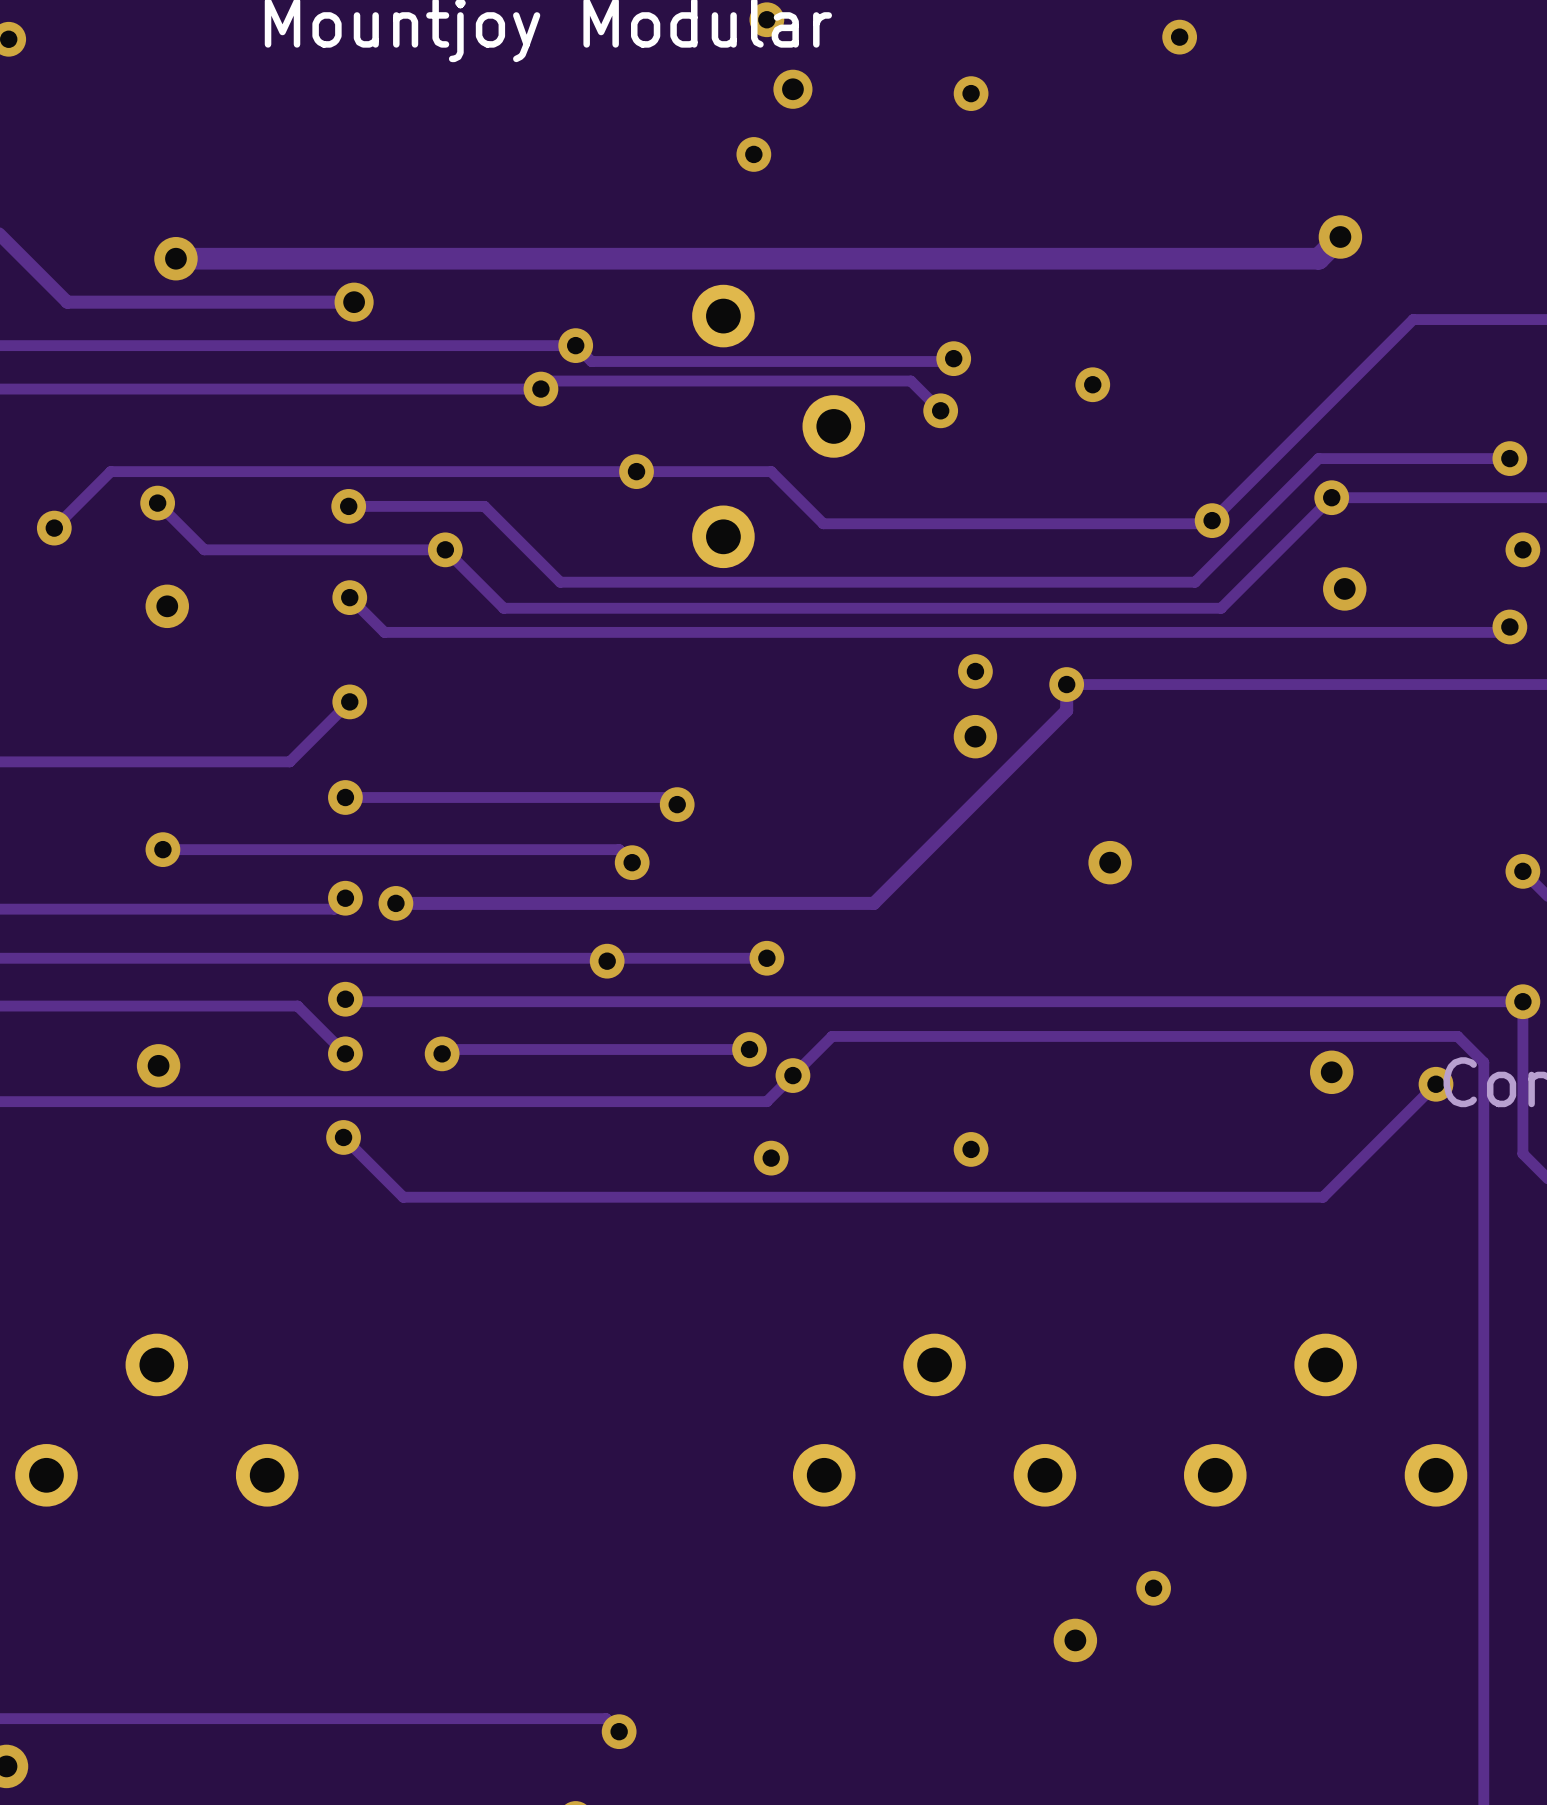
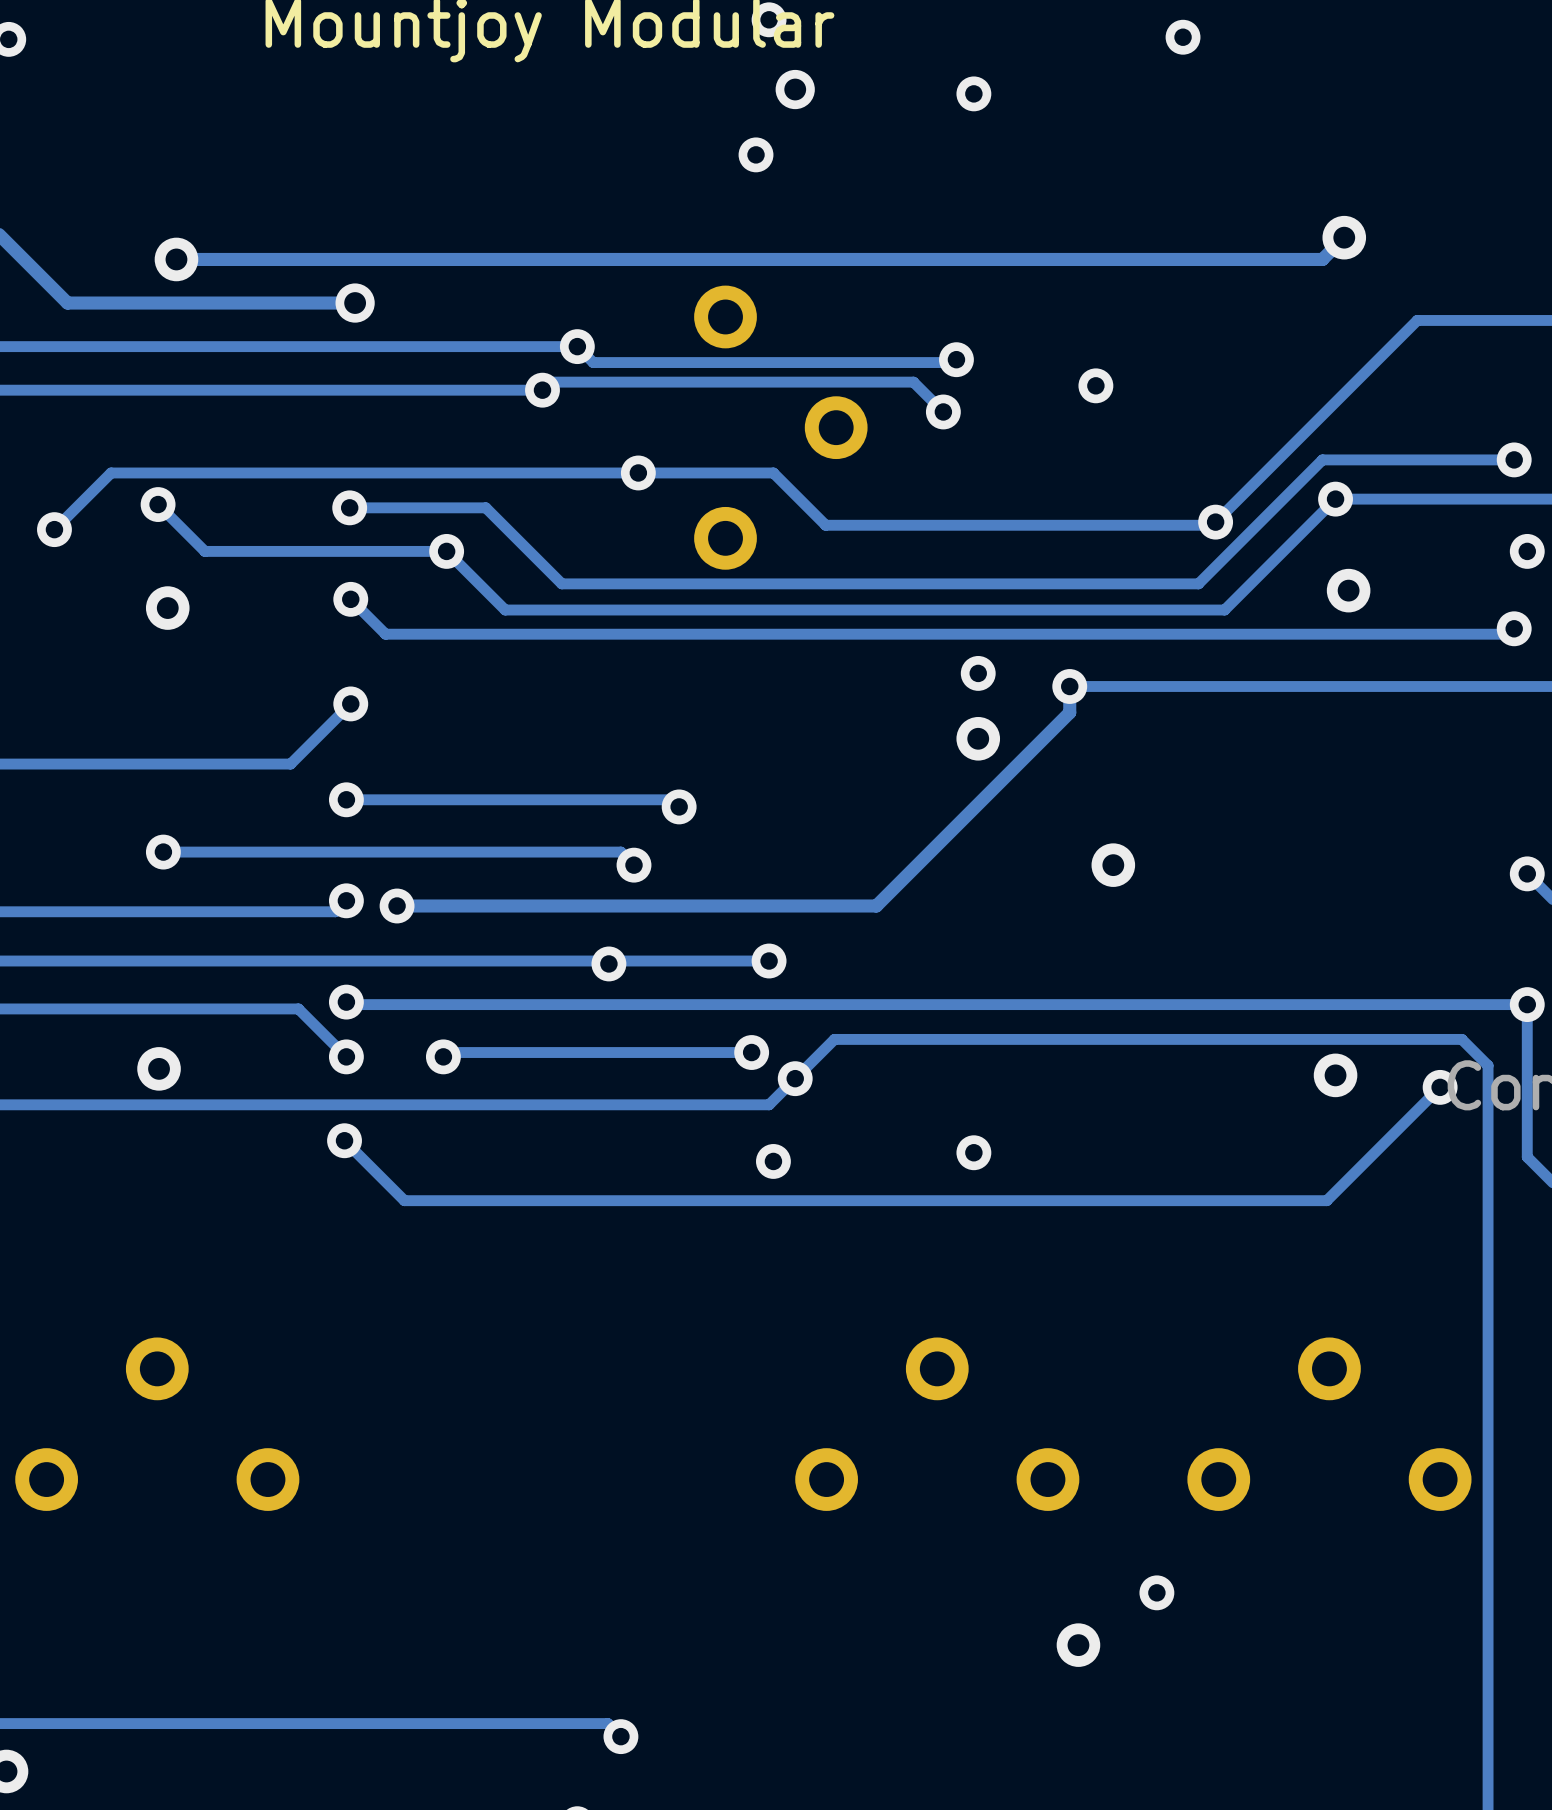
track width: thick (1340, 236) (1318, 258) (175, 258) -> thin (1344, 237) (1322, 259) (176, 259)

